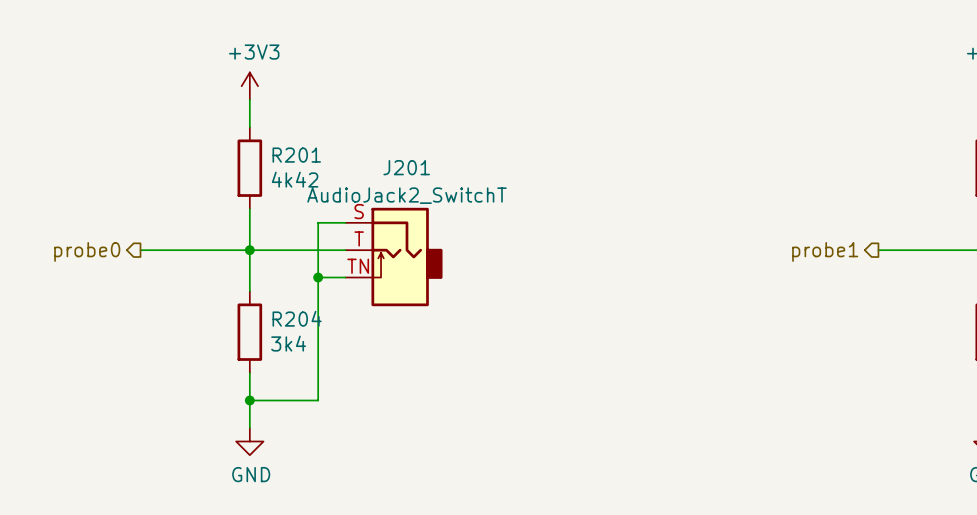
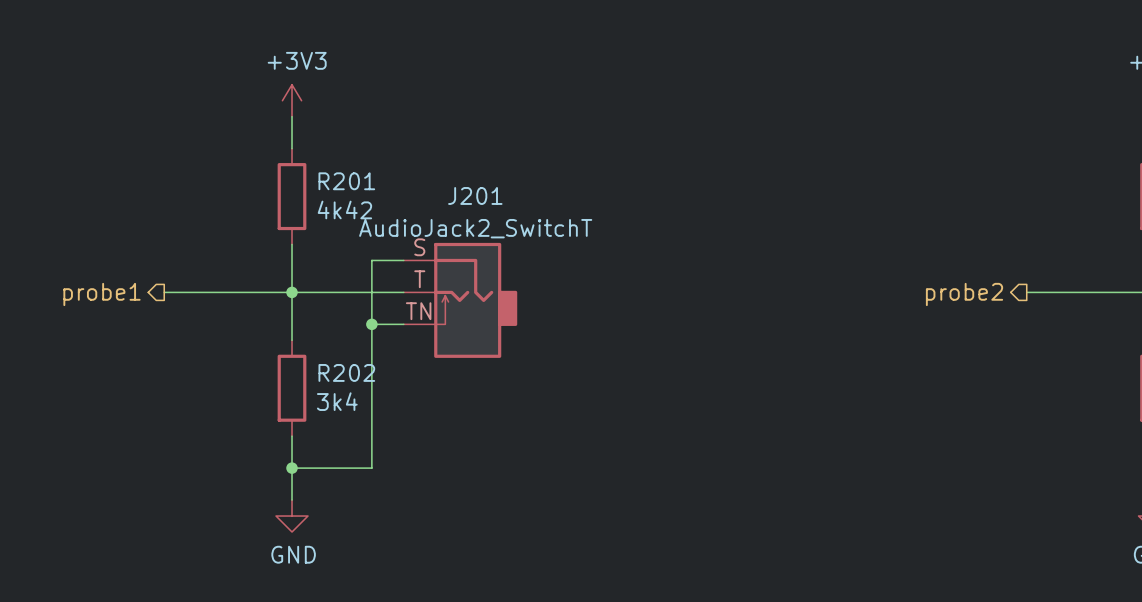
hierarchical label: probe0 (87, 251) -> probe1 (101, 294)
hierarchical label: probe1 (825, 251) -> probe2 (964, 294)
R204 name: R204 (297, 318) -> R202 (346, 372)

